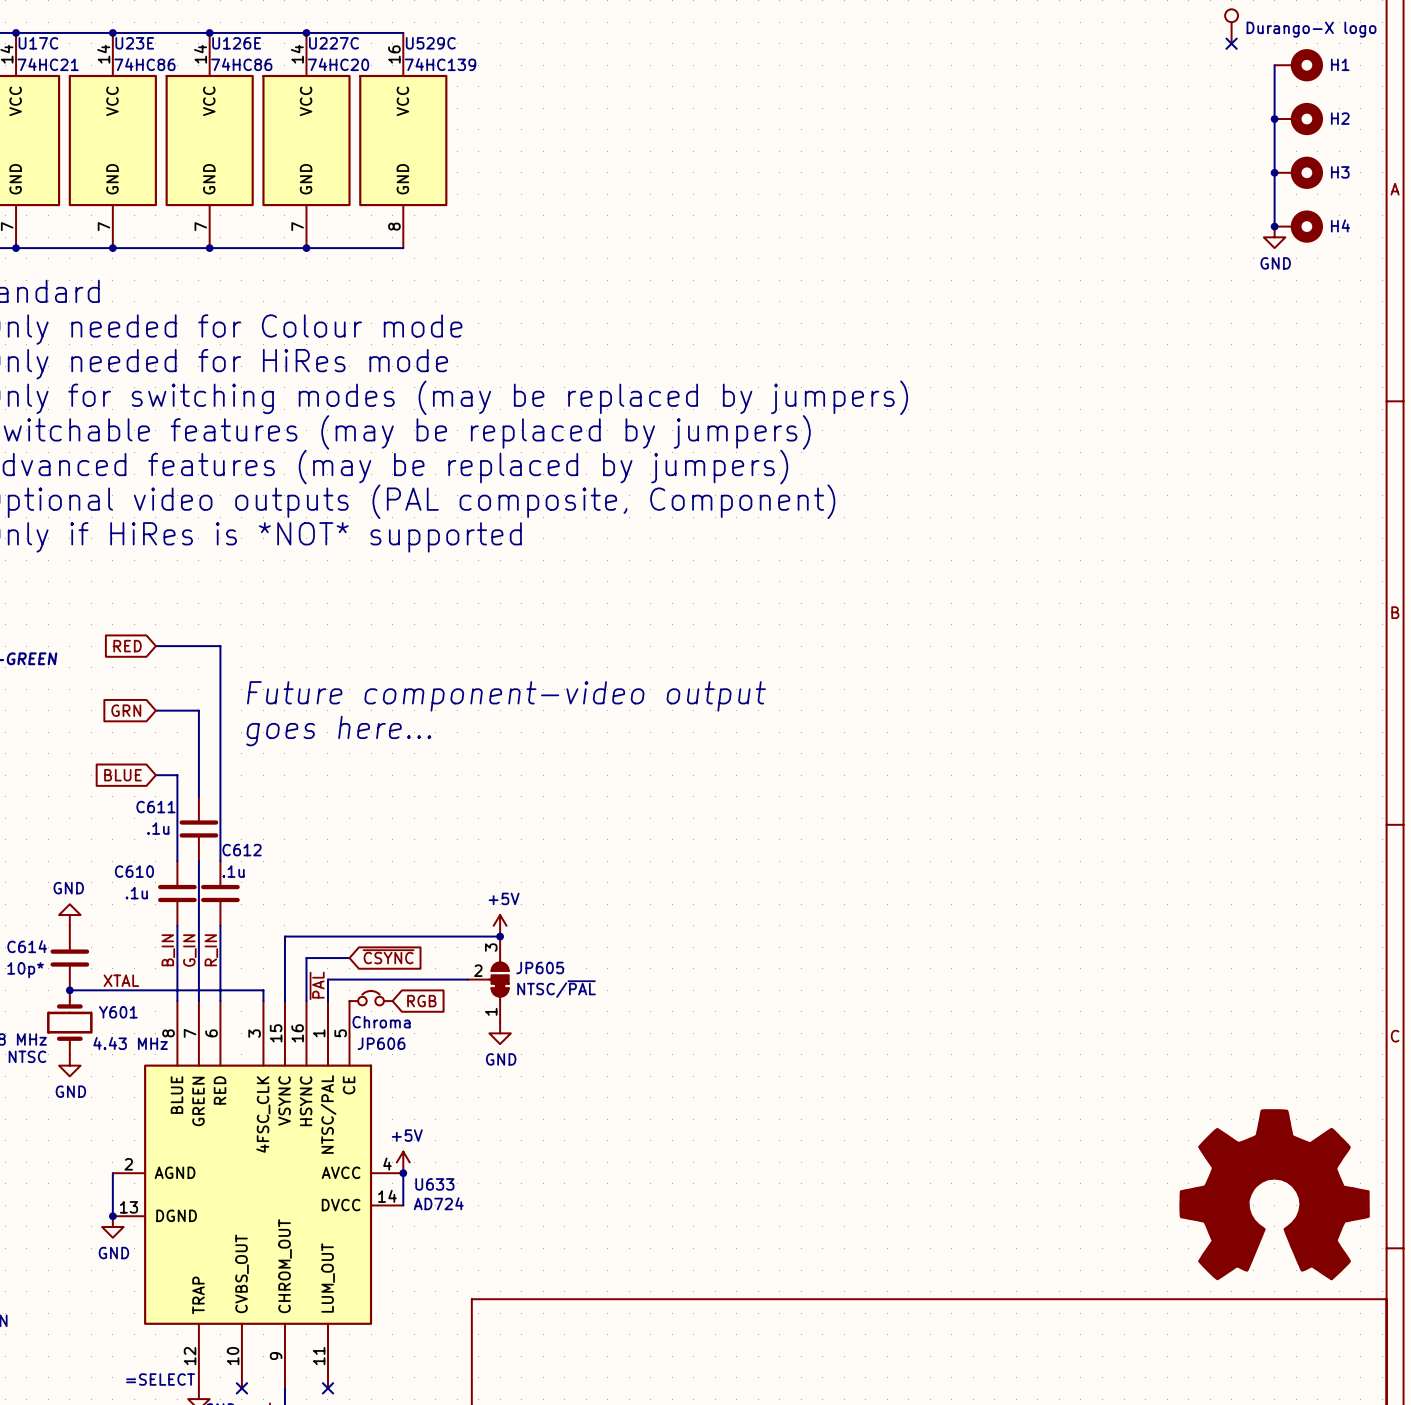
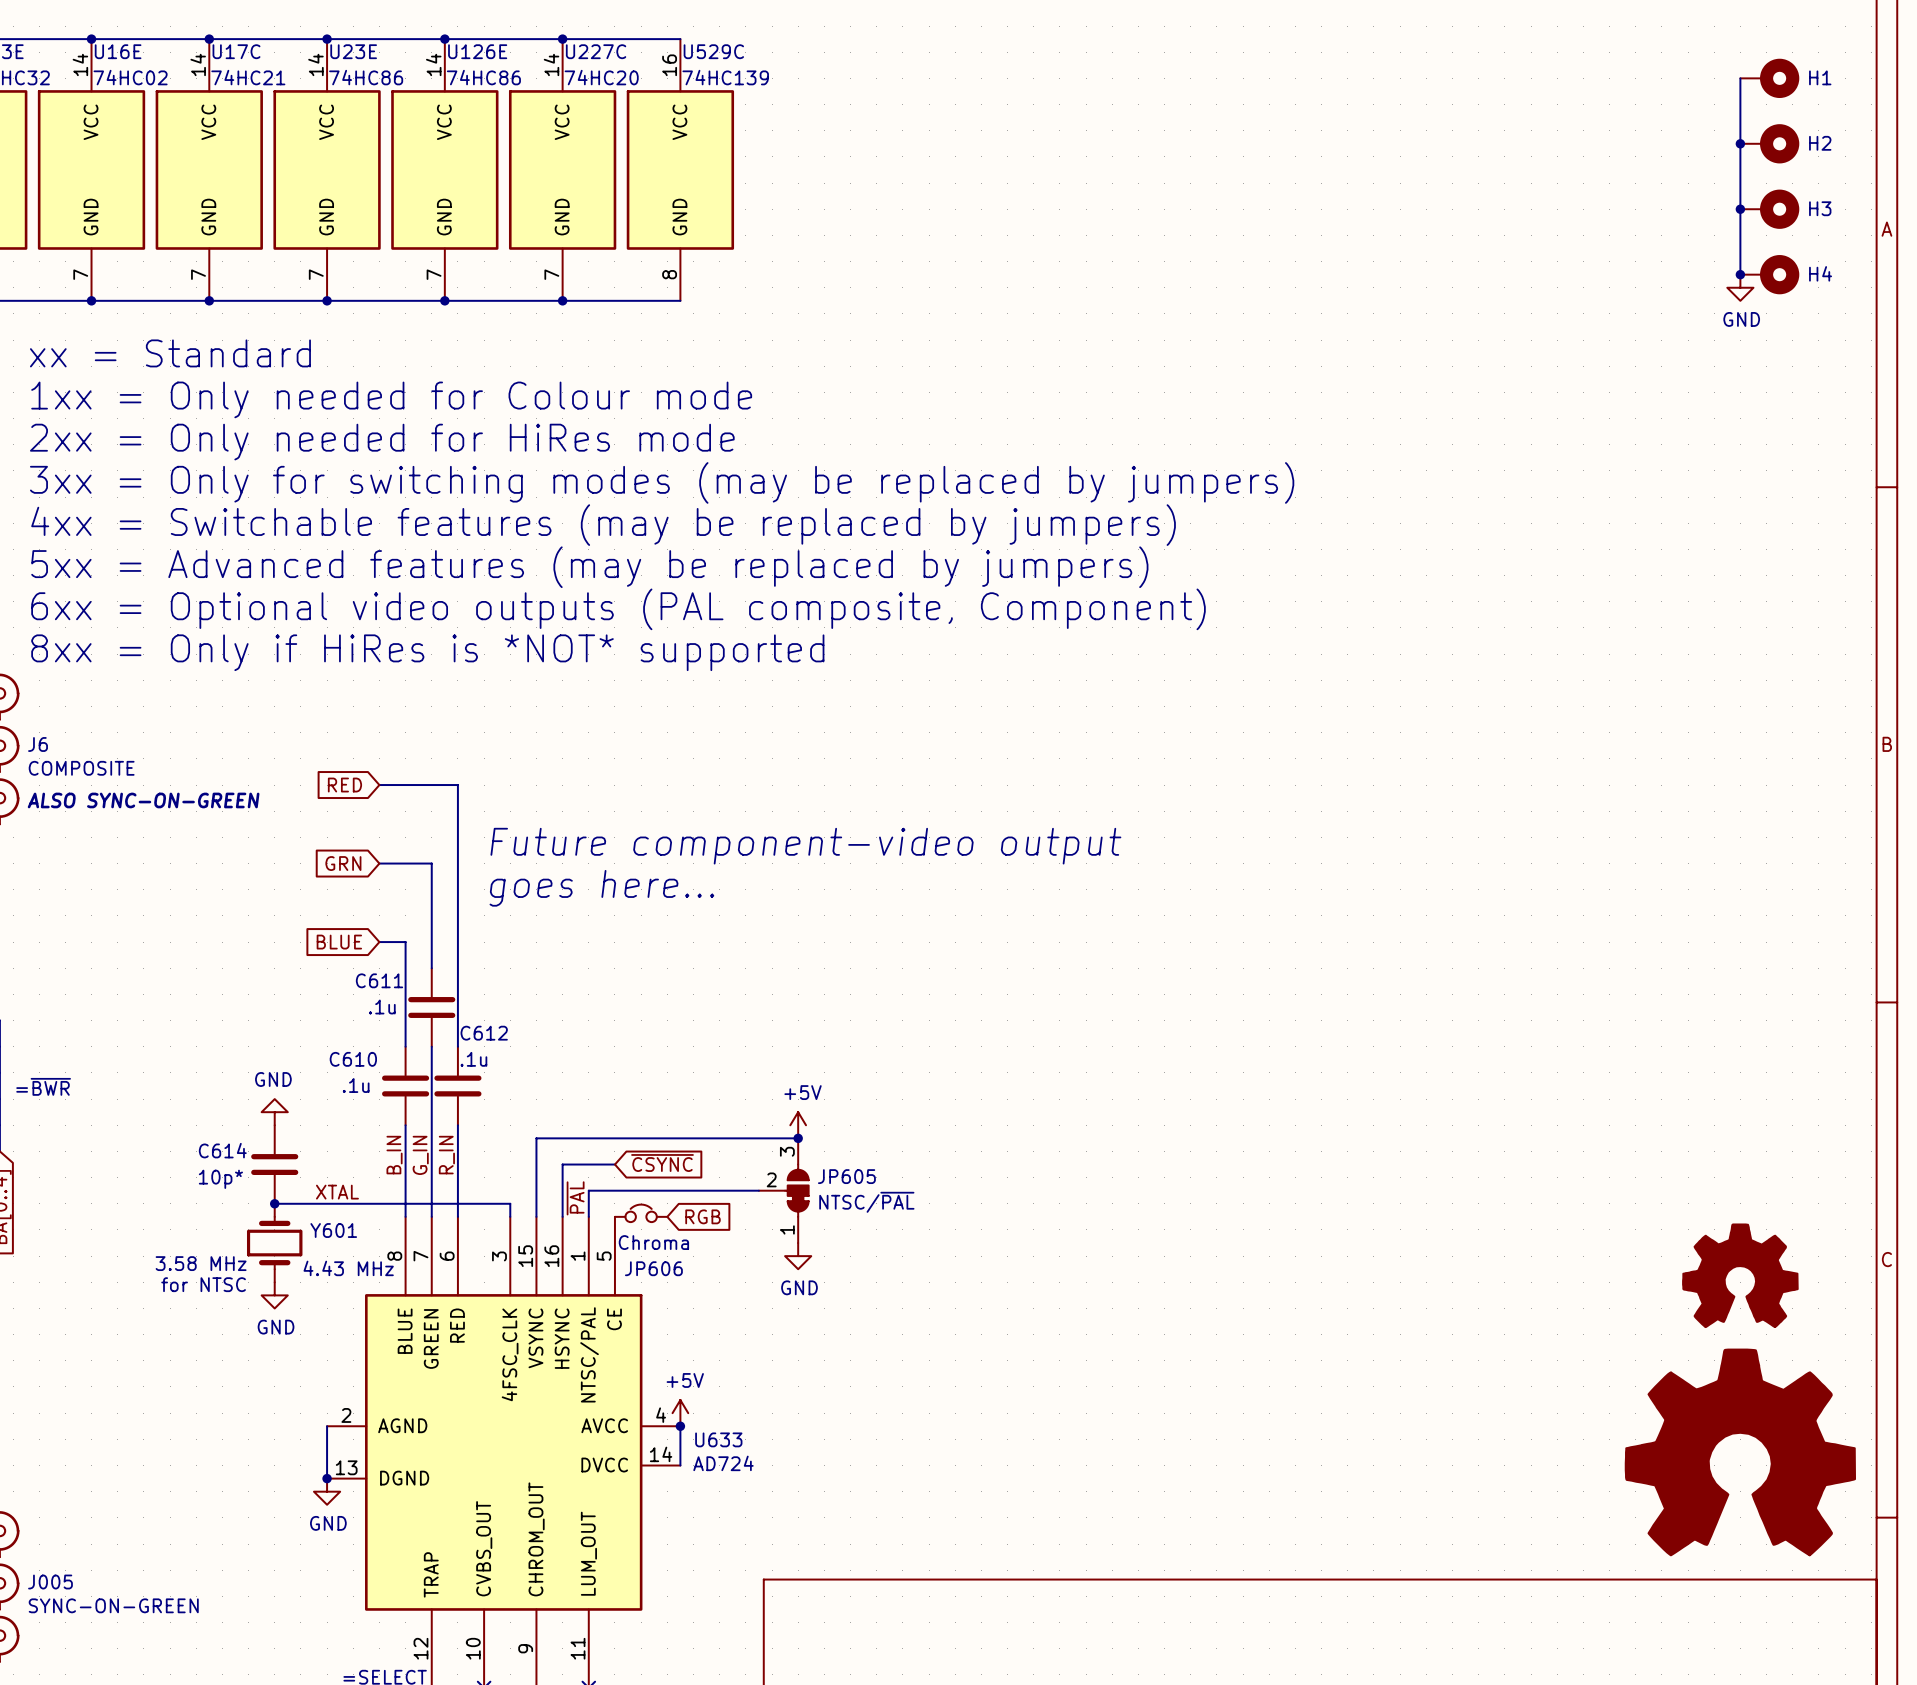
part: Durango-X logo (1231, 26) -> none
no-connect mark: (1231, 43) -> none
part: none -> (1740, 1275)

